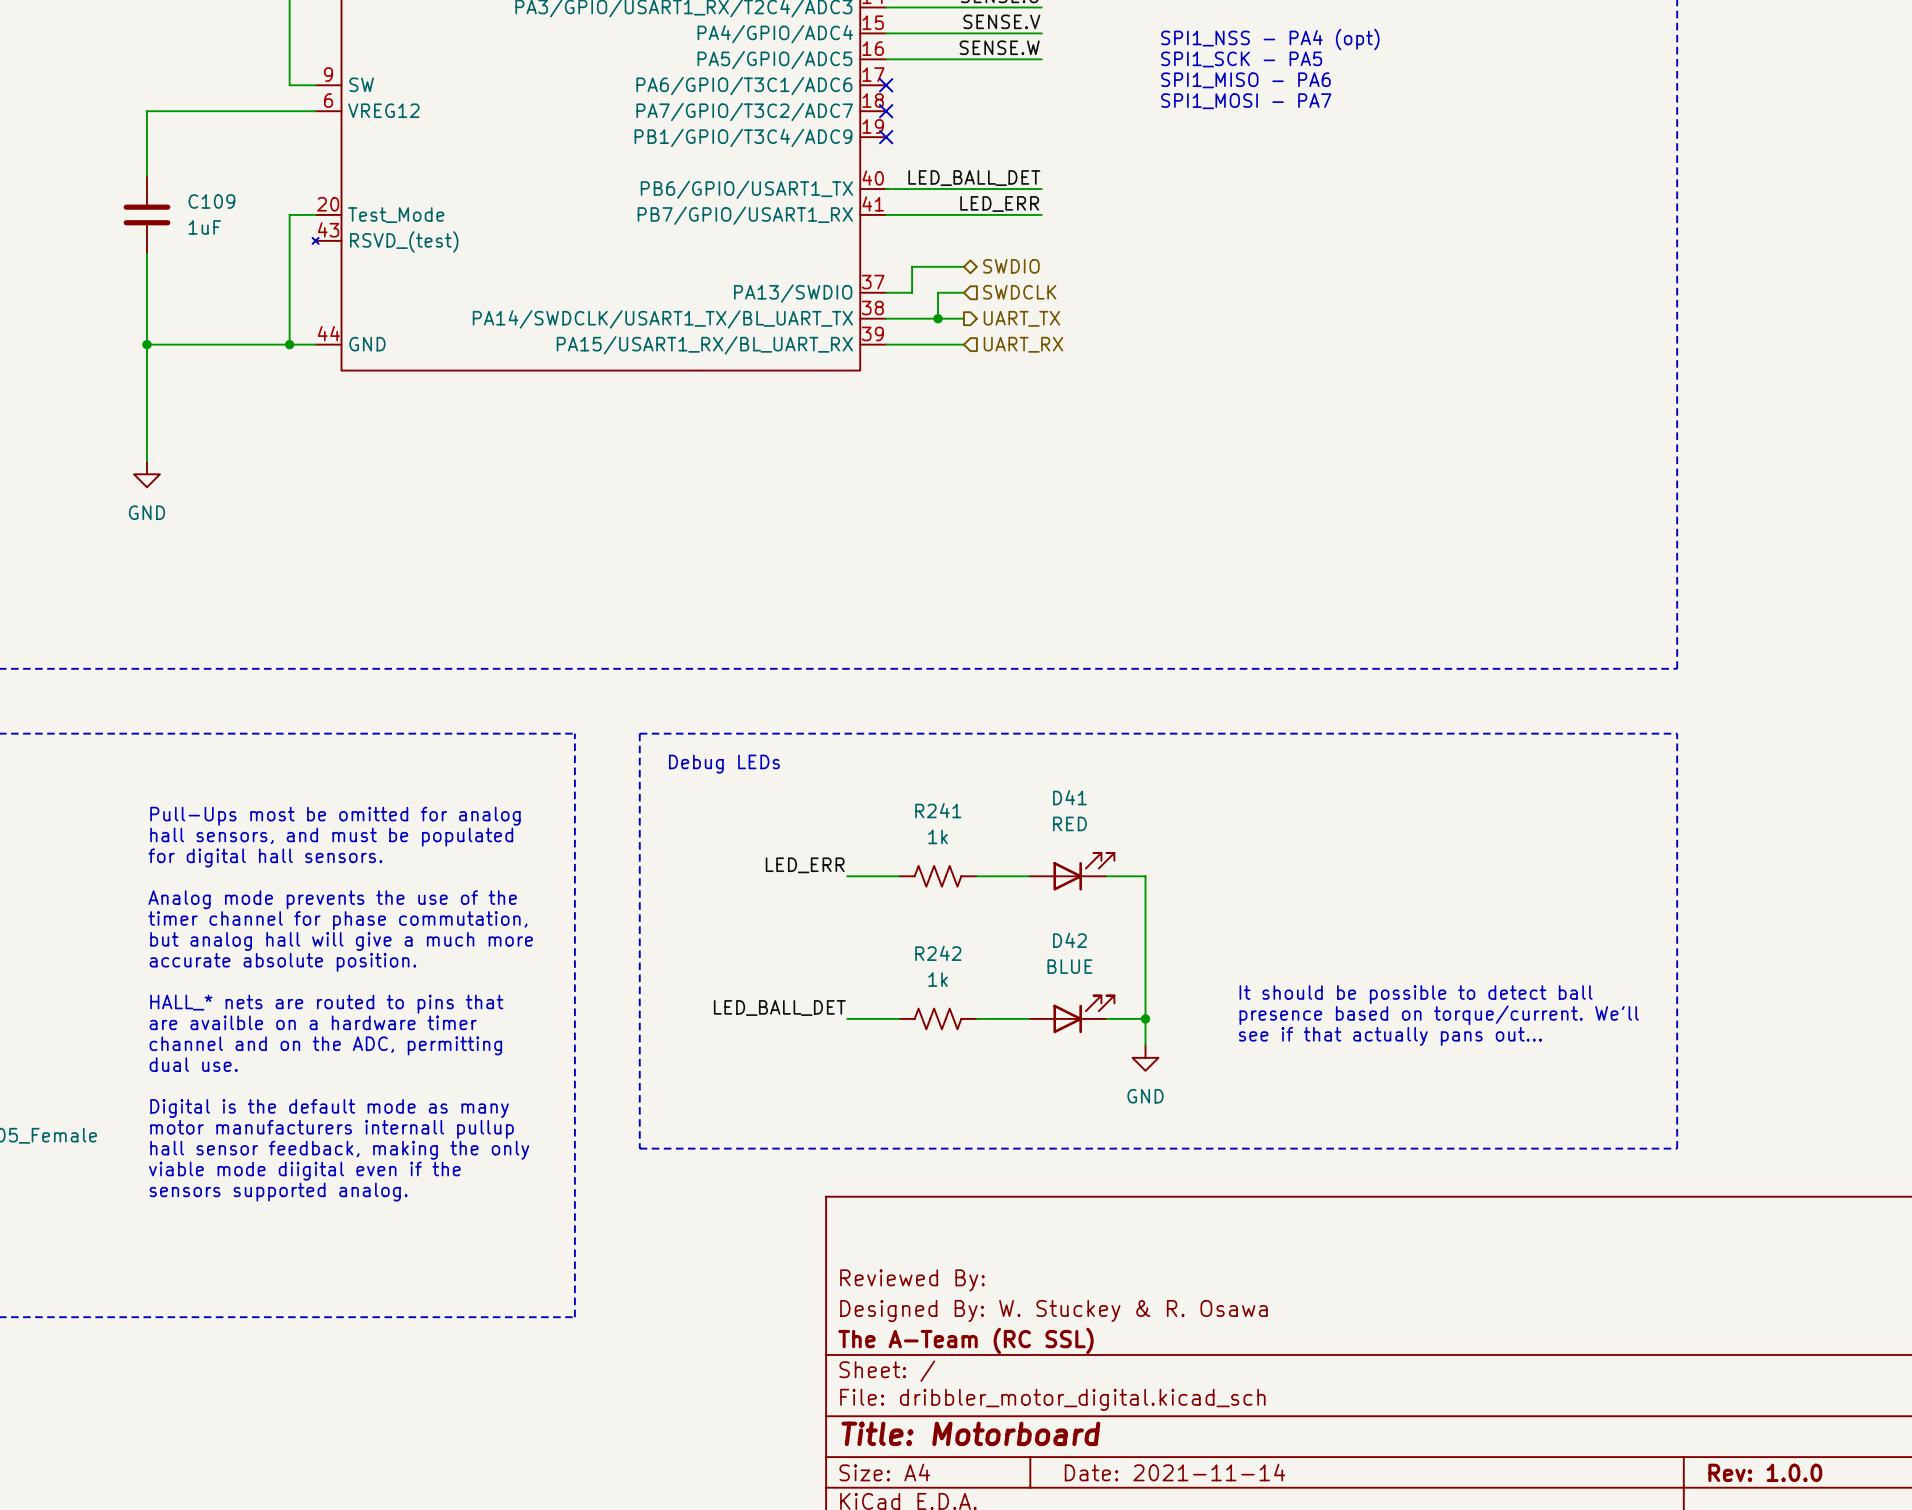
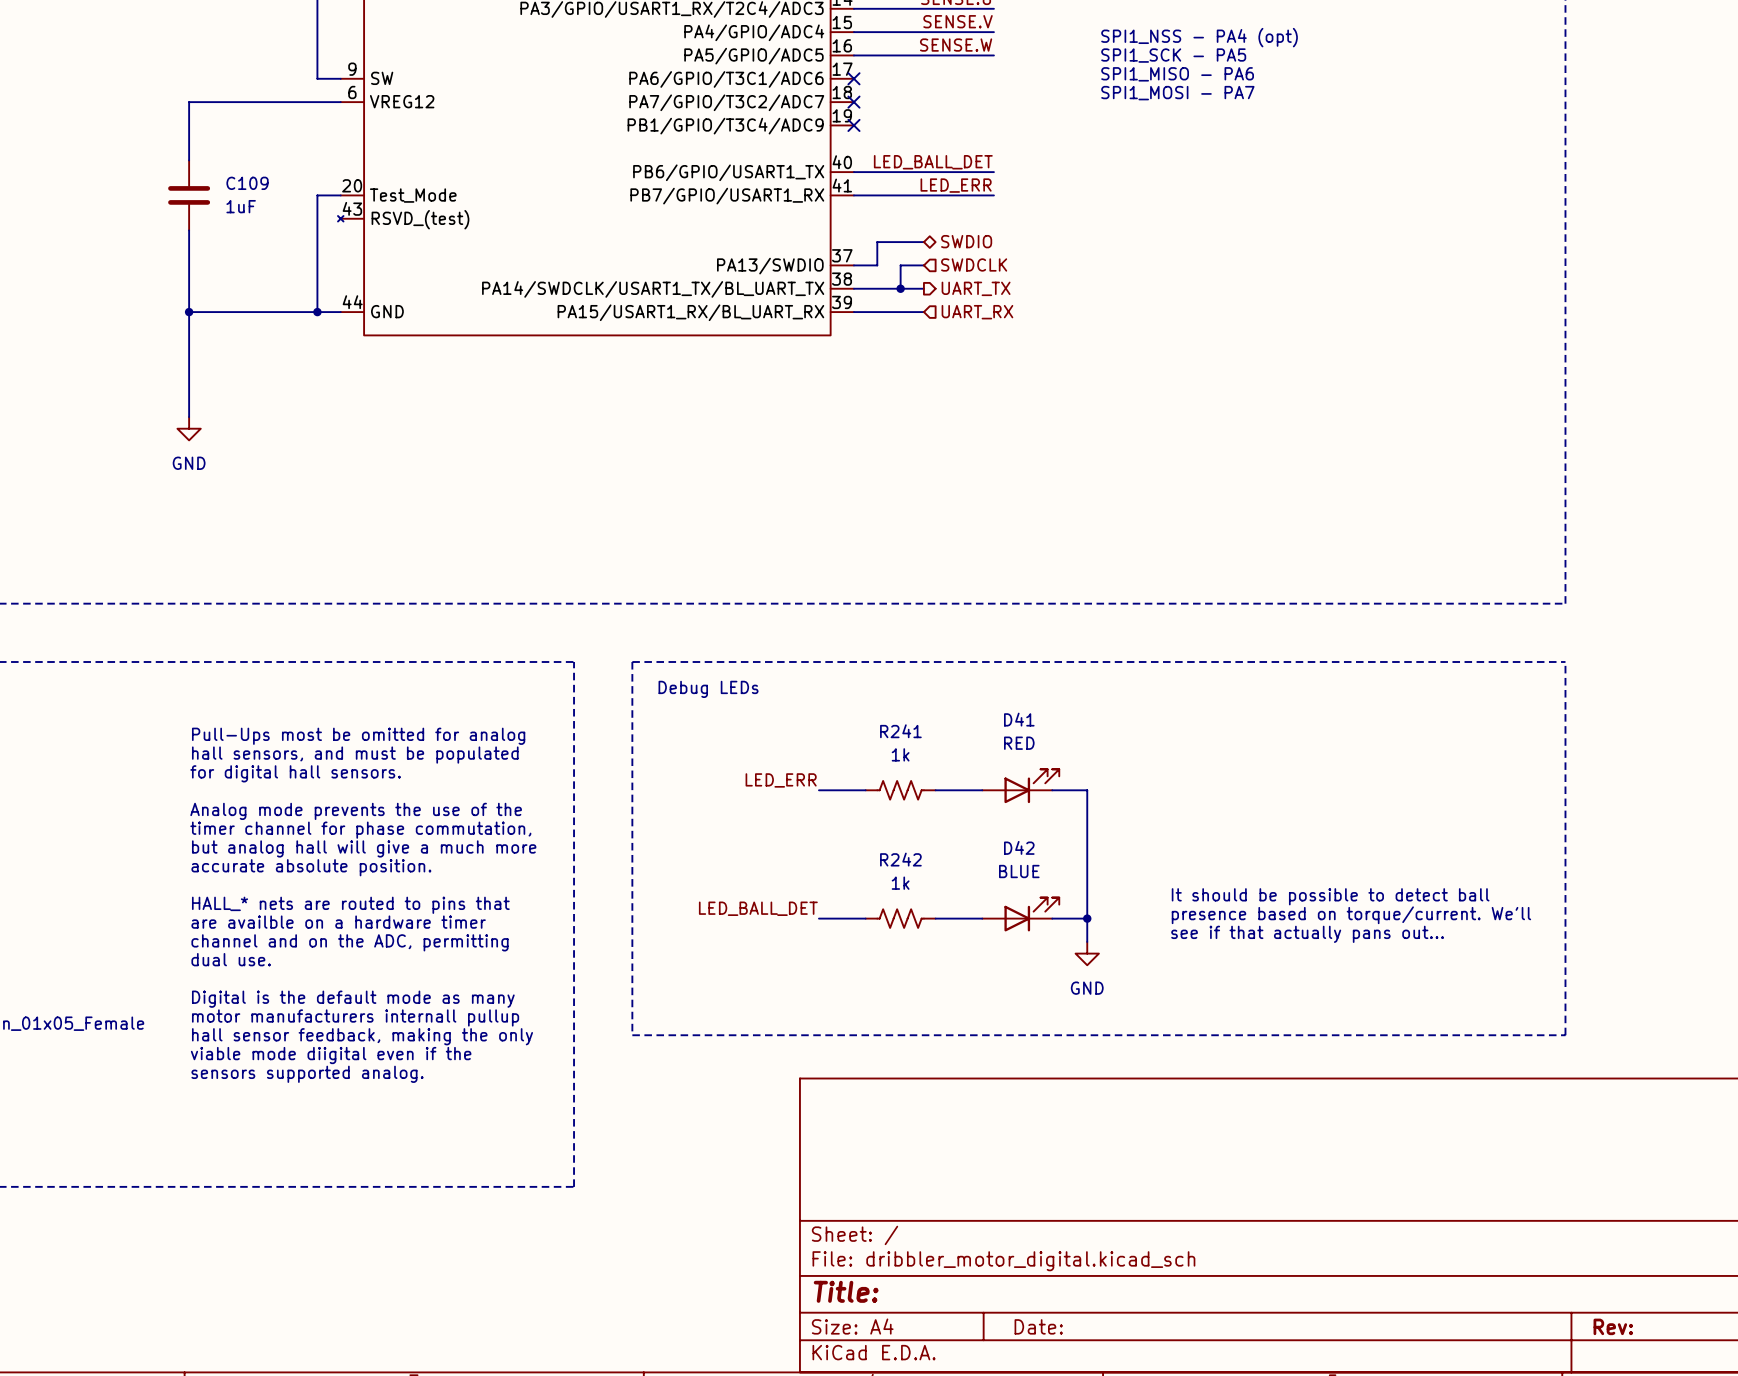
title block: Reviewed By: (912, 1280) -> none
title block: Designed By: W. Stuckey & R. Osawa (1053, 1311) -> none
title block: The A-Team (RC SSL) (965, 1340) -> none
title block: Title: Motorboard (970, 1433) -> Title: (846, 1291)
title block: Date: 2021-11-14 (1175, 1472) -> Date: (1038, 1326)
title block: Rev: 1.0.0 (1765, 1472) -> Rev: (1613, 1326)

